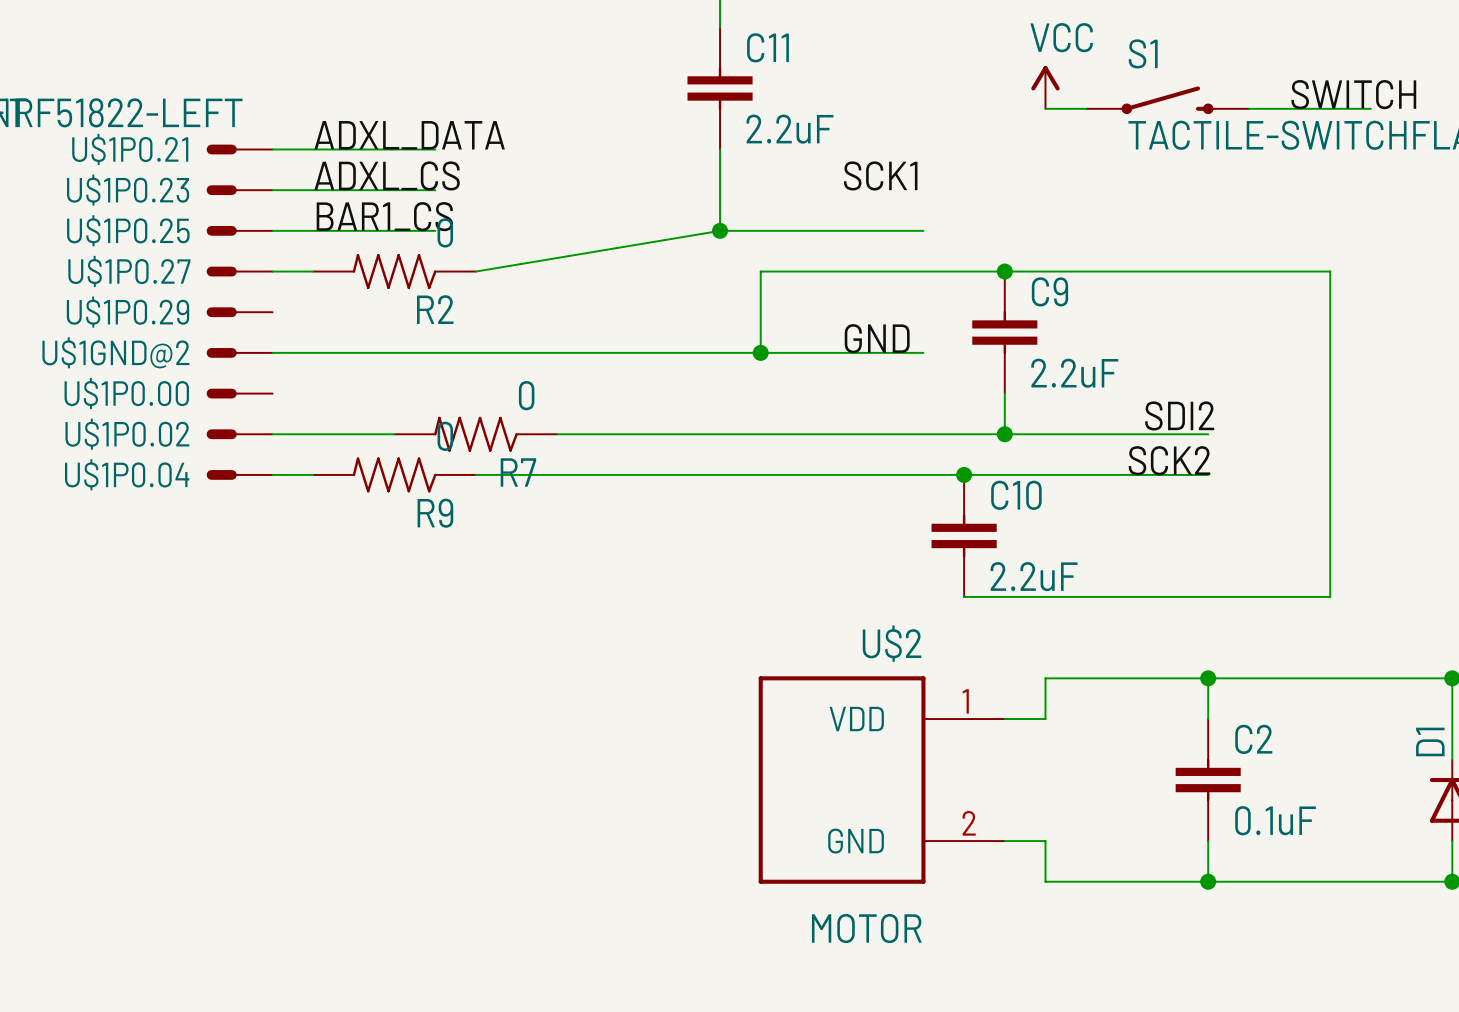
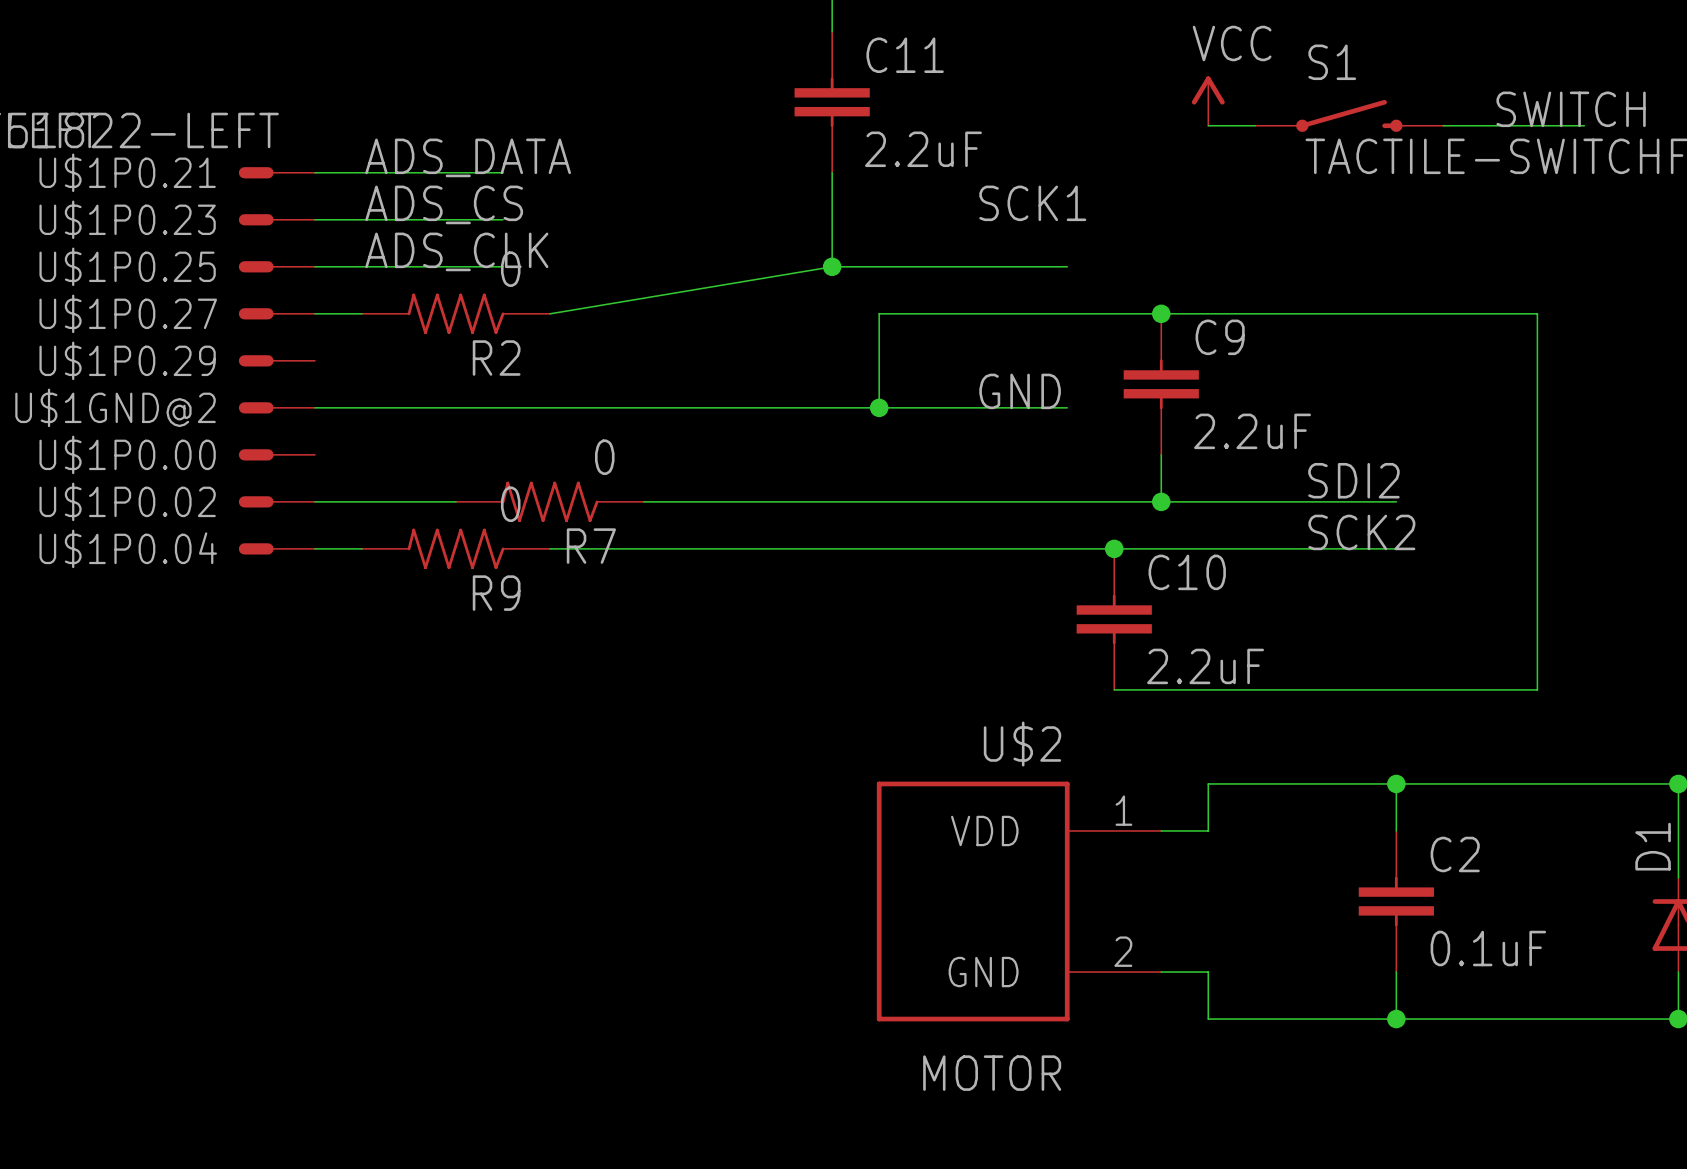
label: ADXL_DATA (409, 135) -> ADS_DATA (468, 157)
label: ADXL_CS (387, 175) -> ADS_CS (444, 204)
label: BAR1_CS (384, 216) -> ADS_CLK (456, 251)

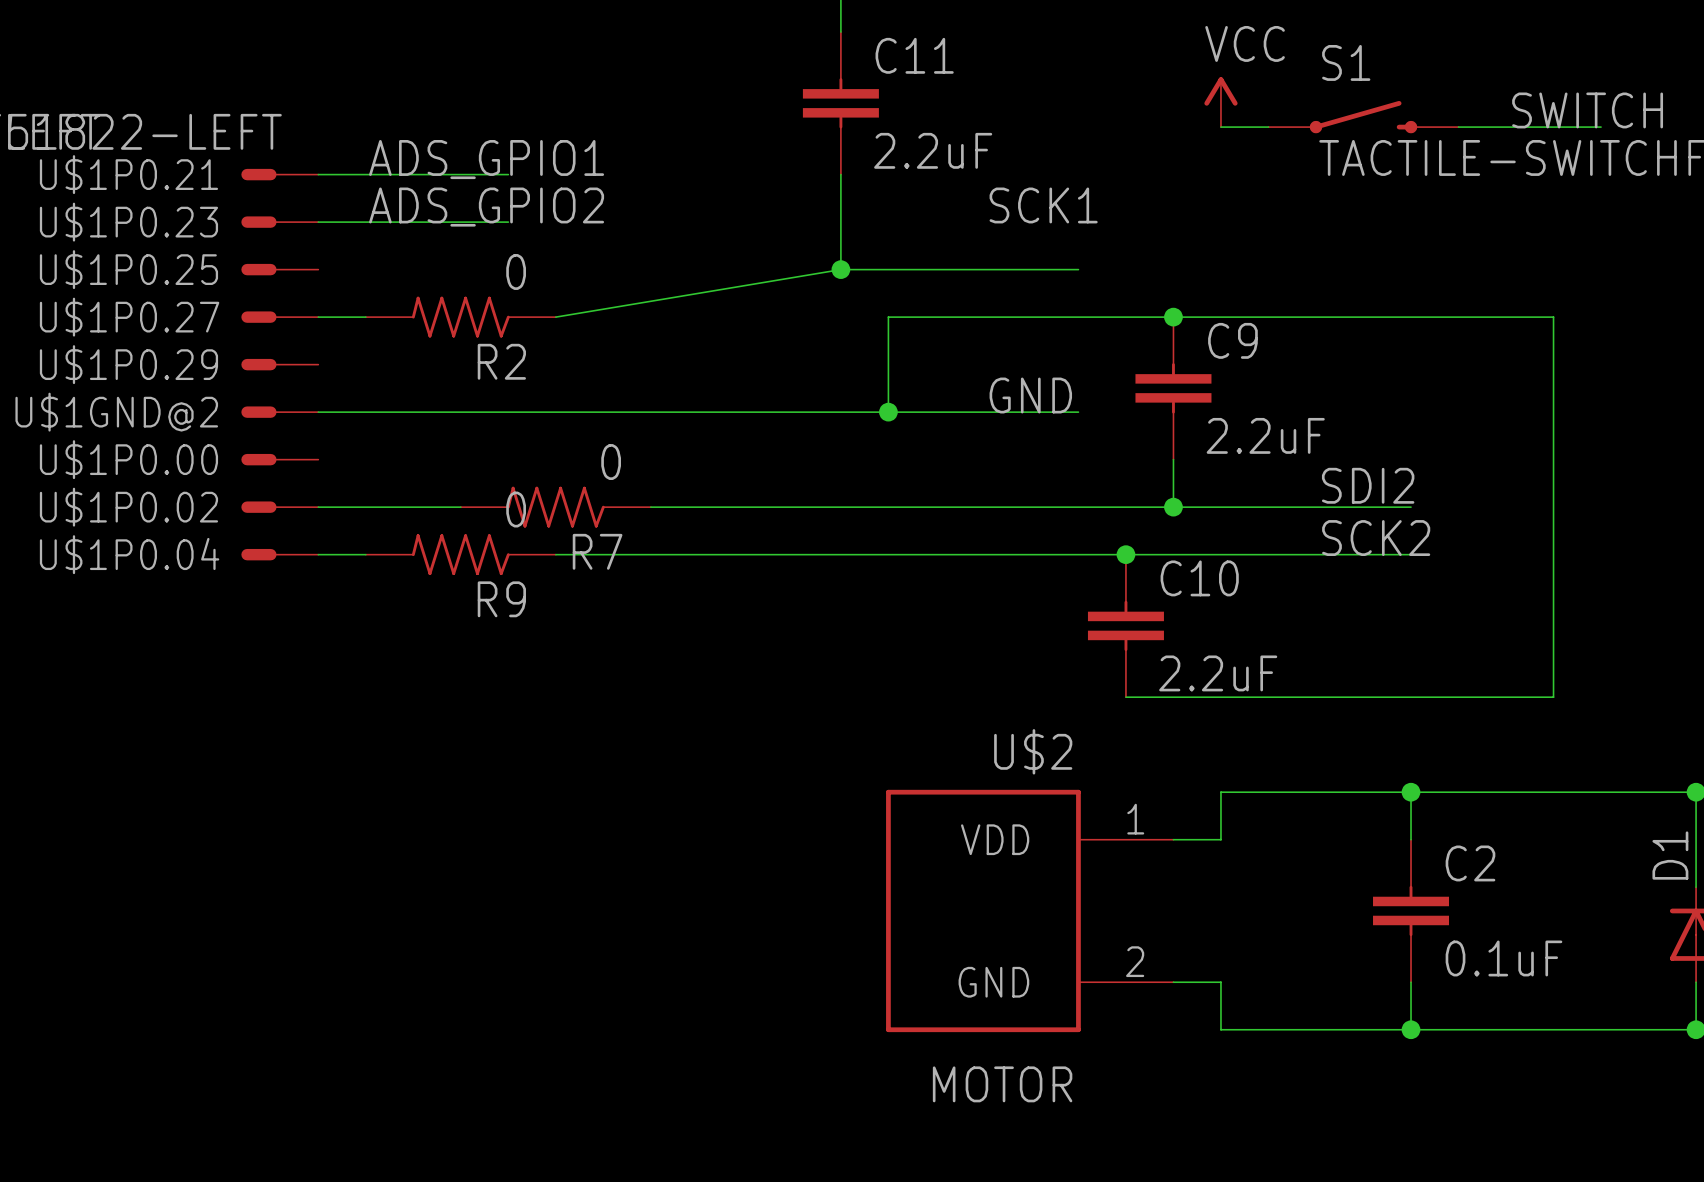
label: ADS_DATA (468, 157) -> ADS_GPIO1 (486, 159)
label: ADS_CS (444, 204) -> ADS_GPIO2 (486, 207)
label: ADS_CLK (456, 251) -> none
wire: (315, 266) (503, 266) -> none

